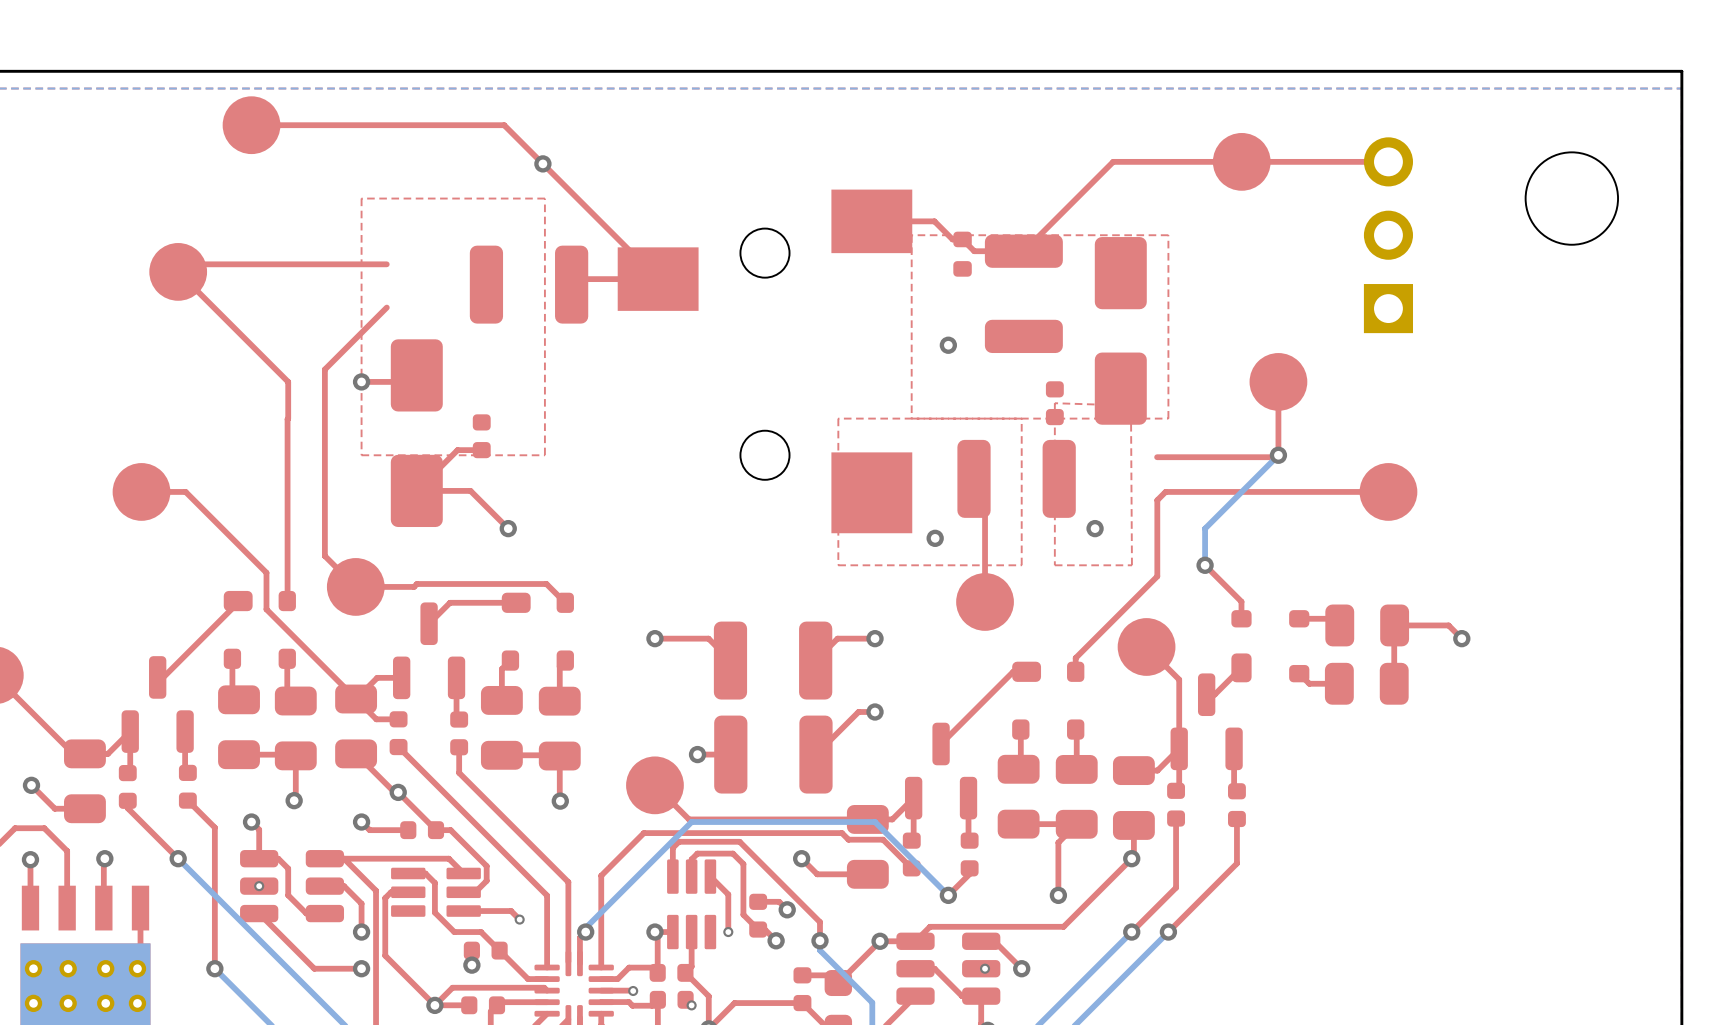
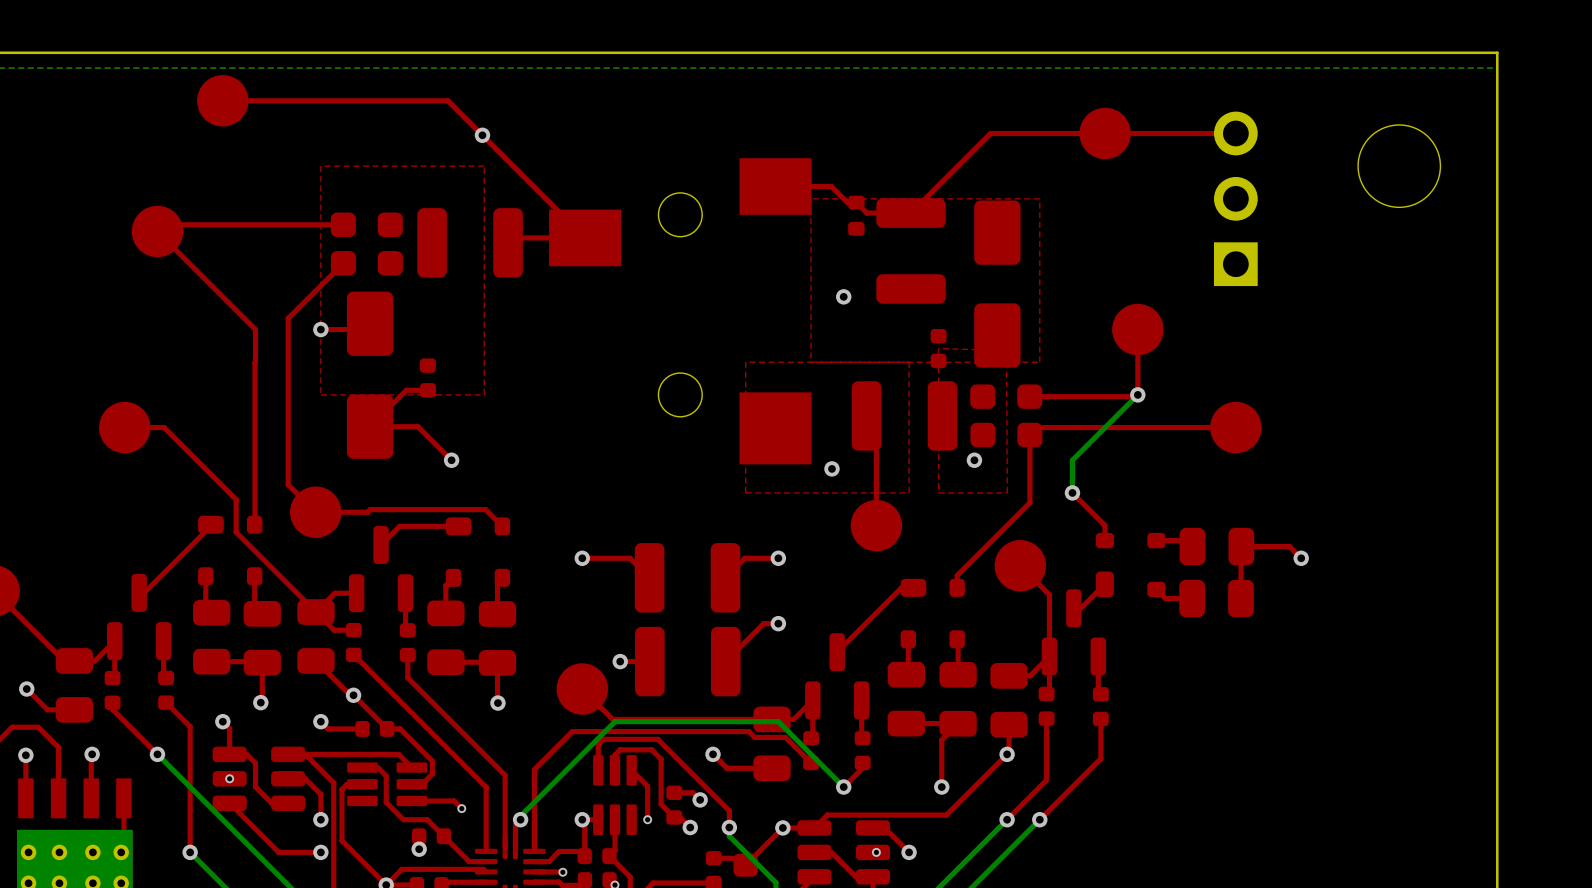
part: none -> (366, 224)
part: none -> (366, 263)
part: none -> (1006, 396)
part: none -> (1006, 434)

